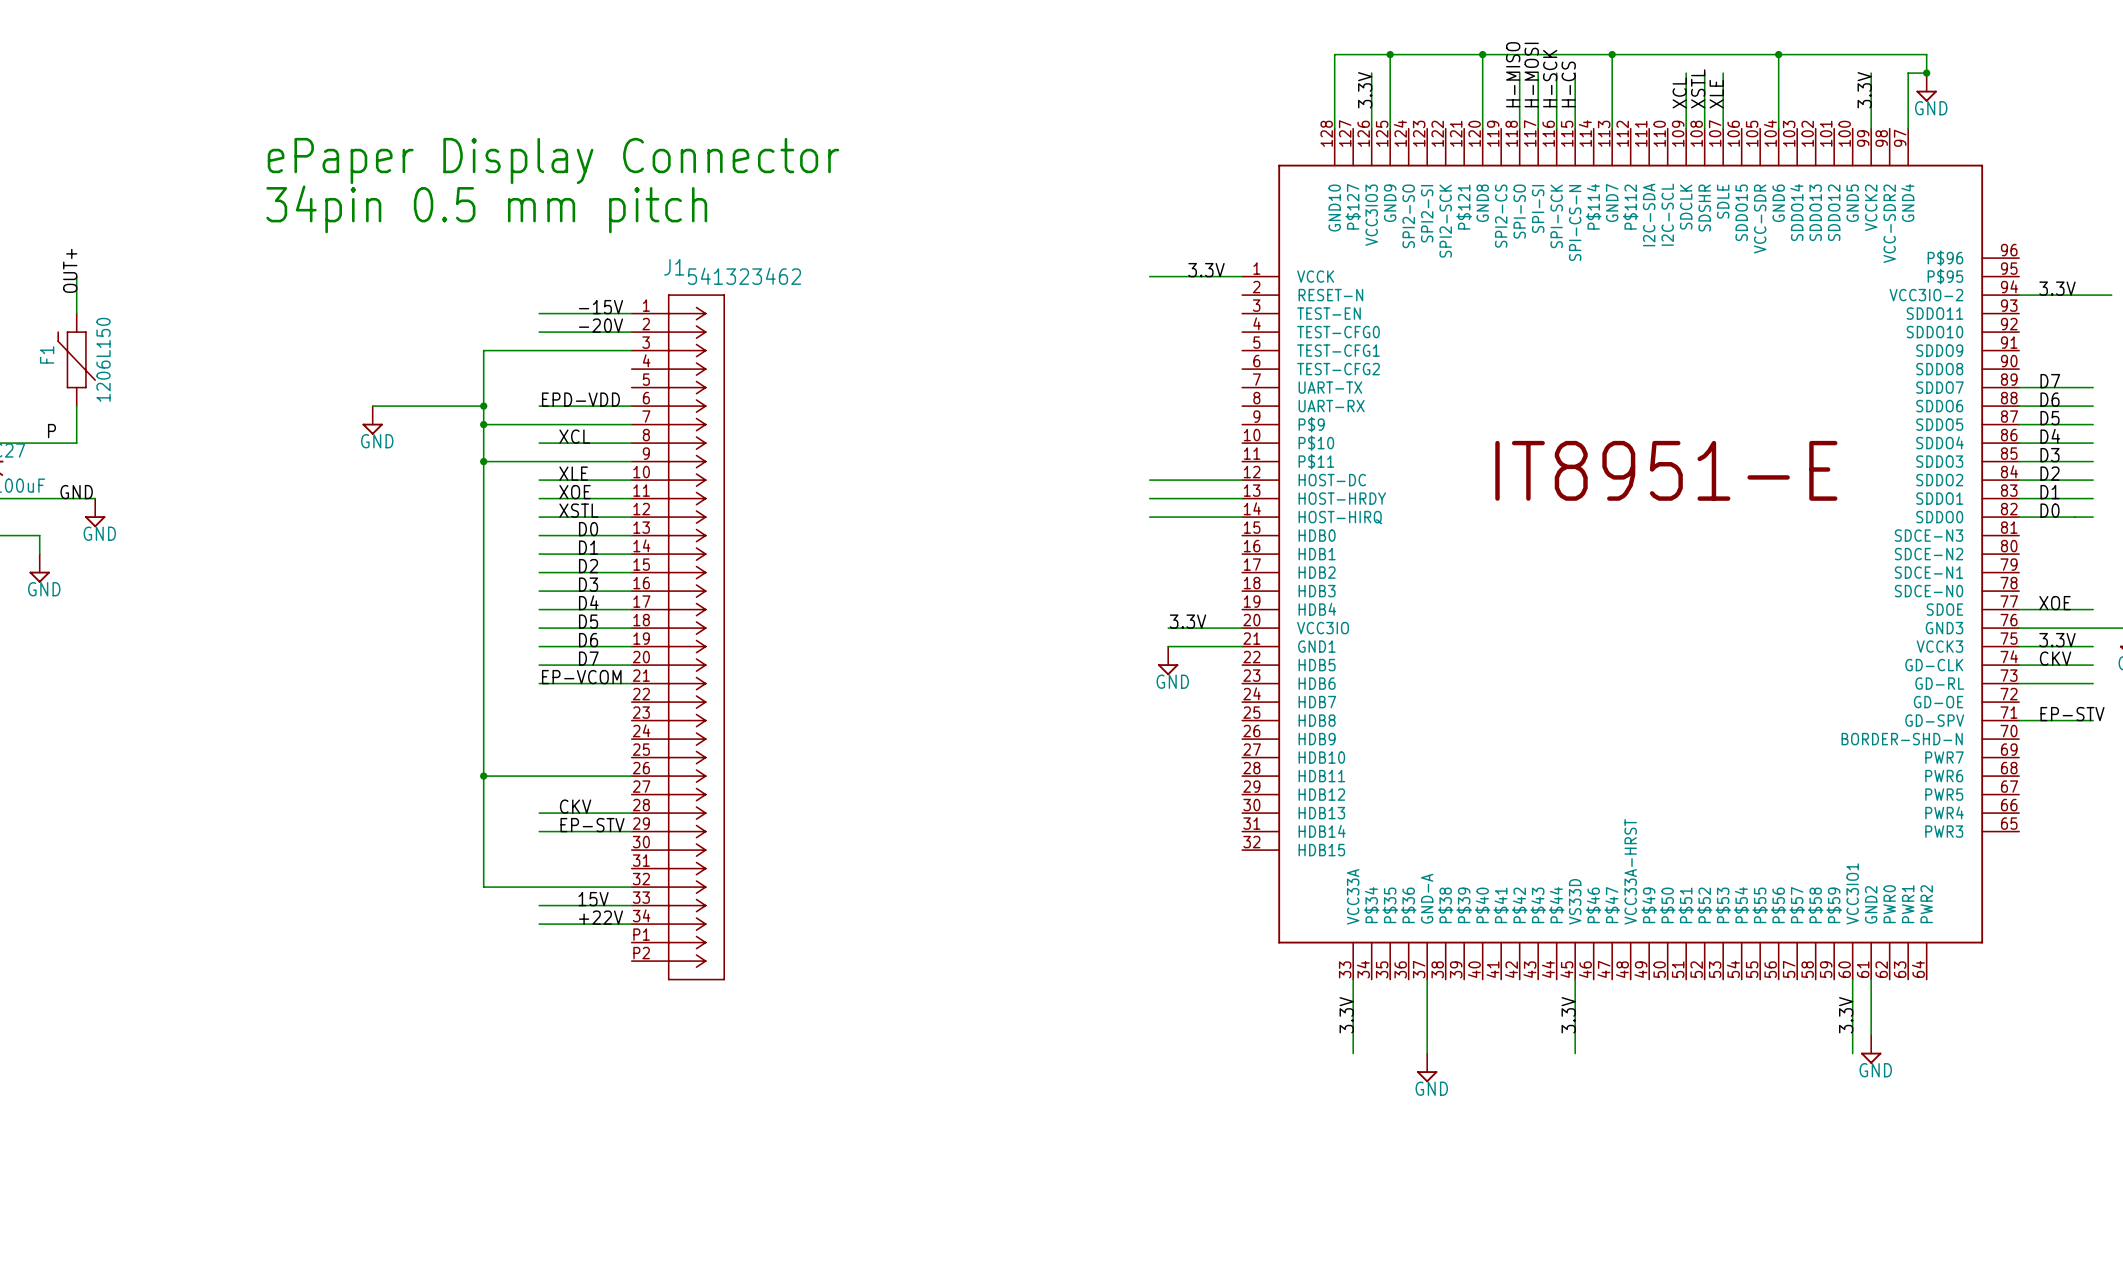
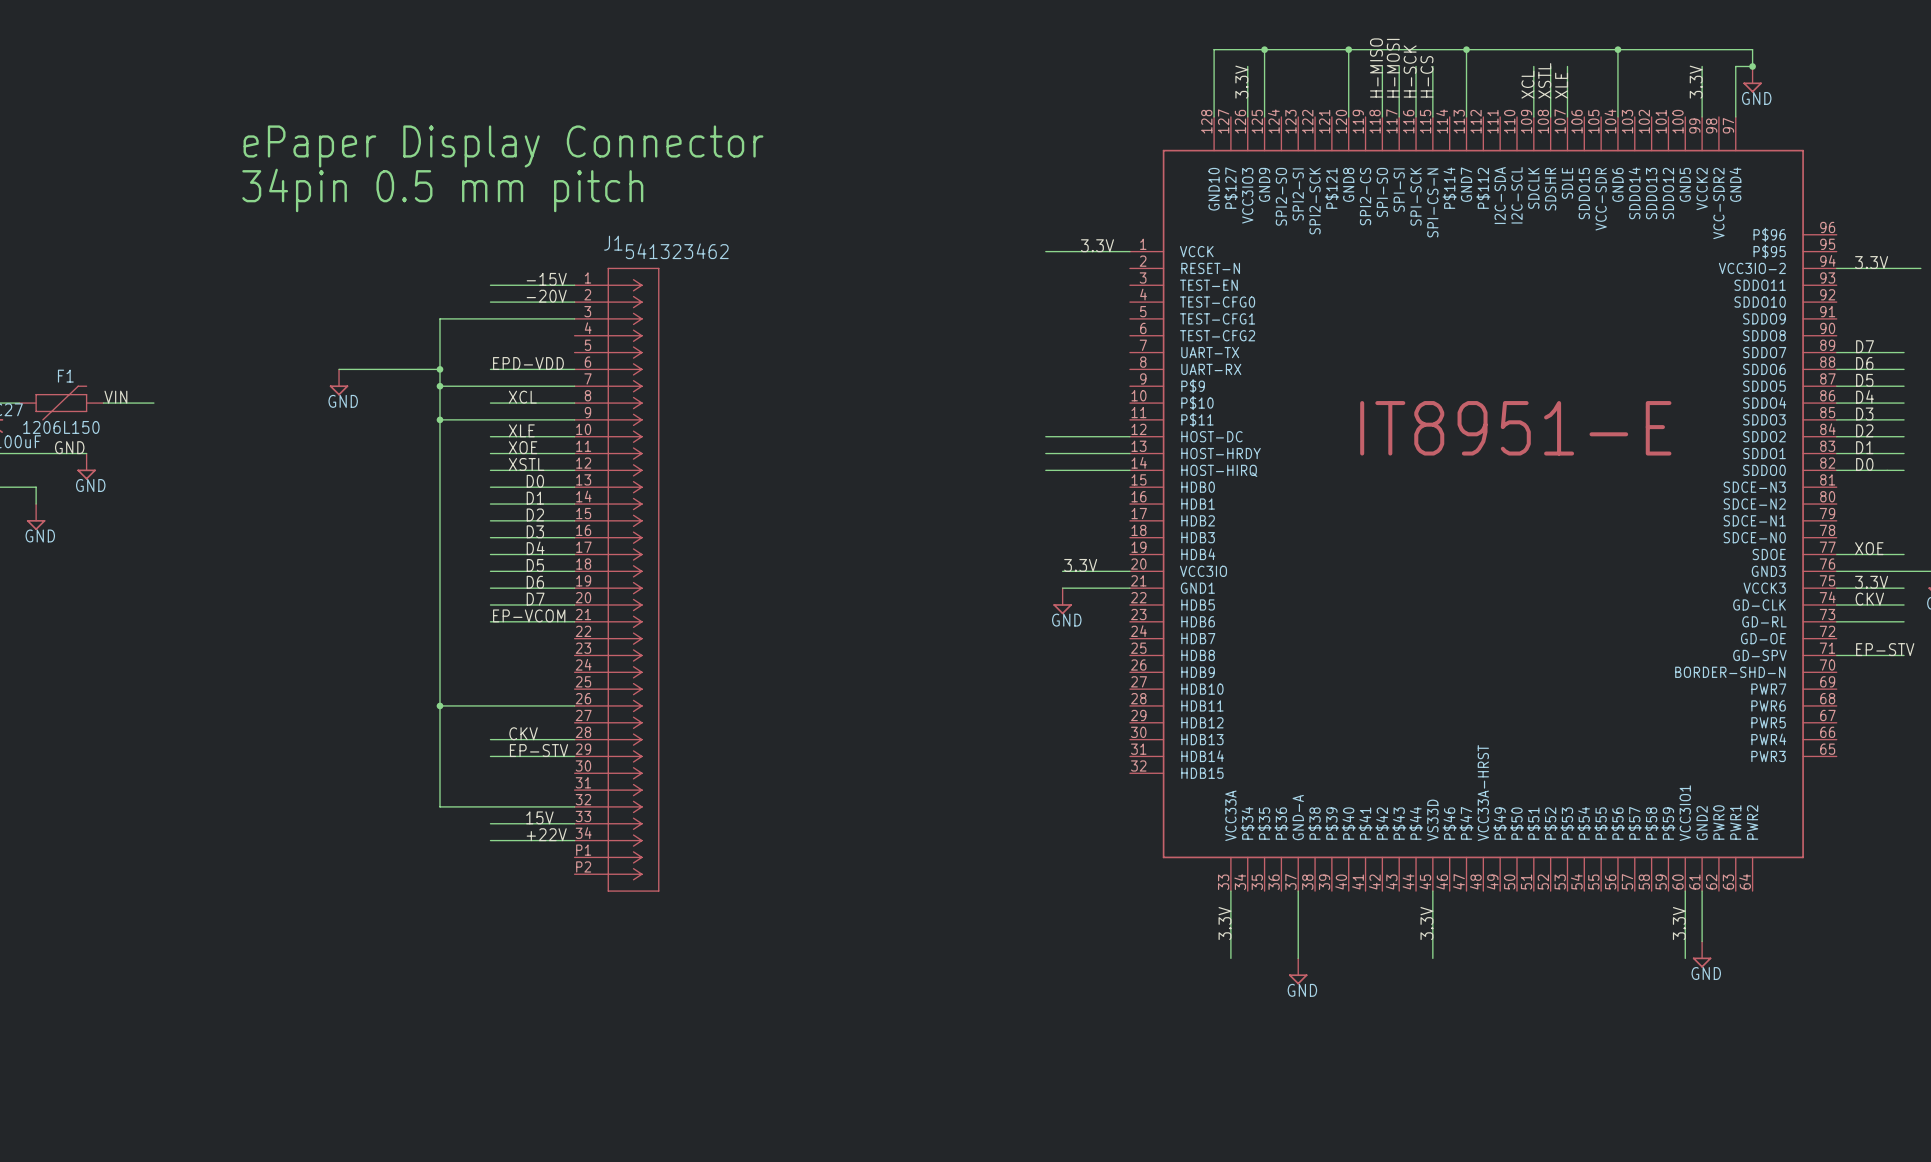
label: OUT+ (70, 270) -> none
wire: (76, 276) (76, 313) -> none
F1 rotation: 0° (76, 359) -> 90° clockwise (61, 403)
F1 position: (76, 359) -> (61, 403)
wire: (76, 406) (76, 443) (21, 443) -> none
label: P (51, 431) -> none
label: none -> VIN (115, 397)
wire: none -> (103, 403) (153, 403)

